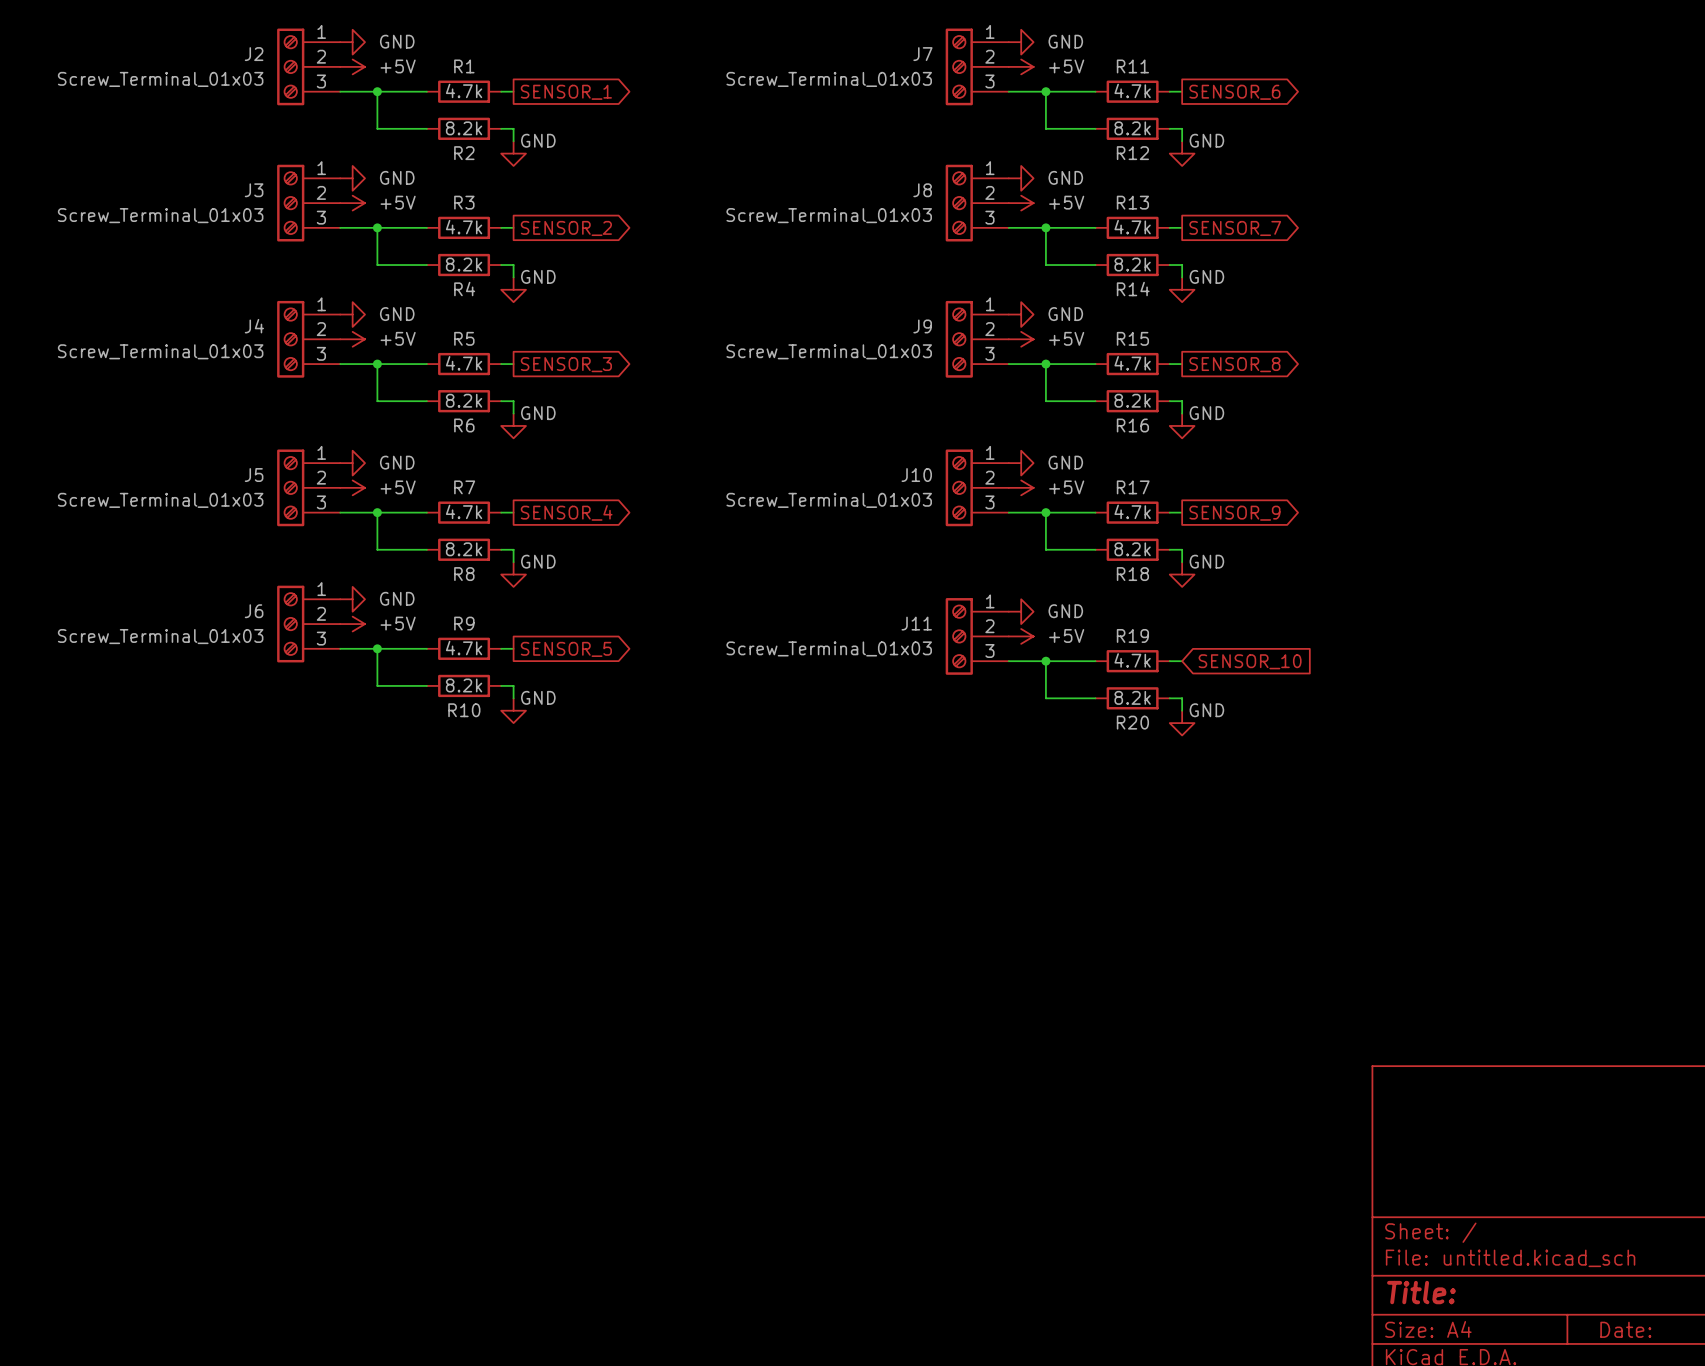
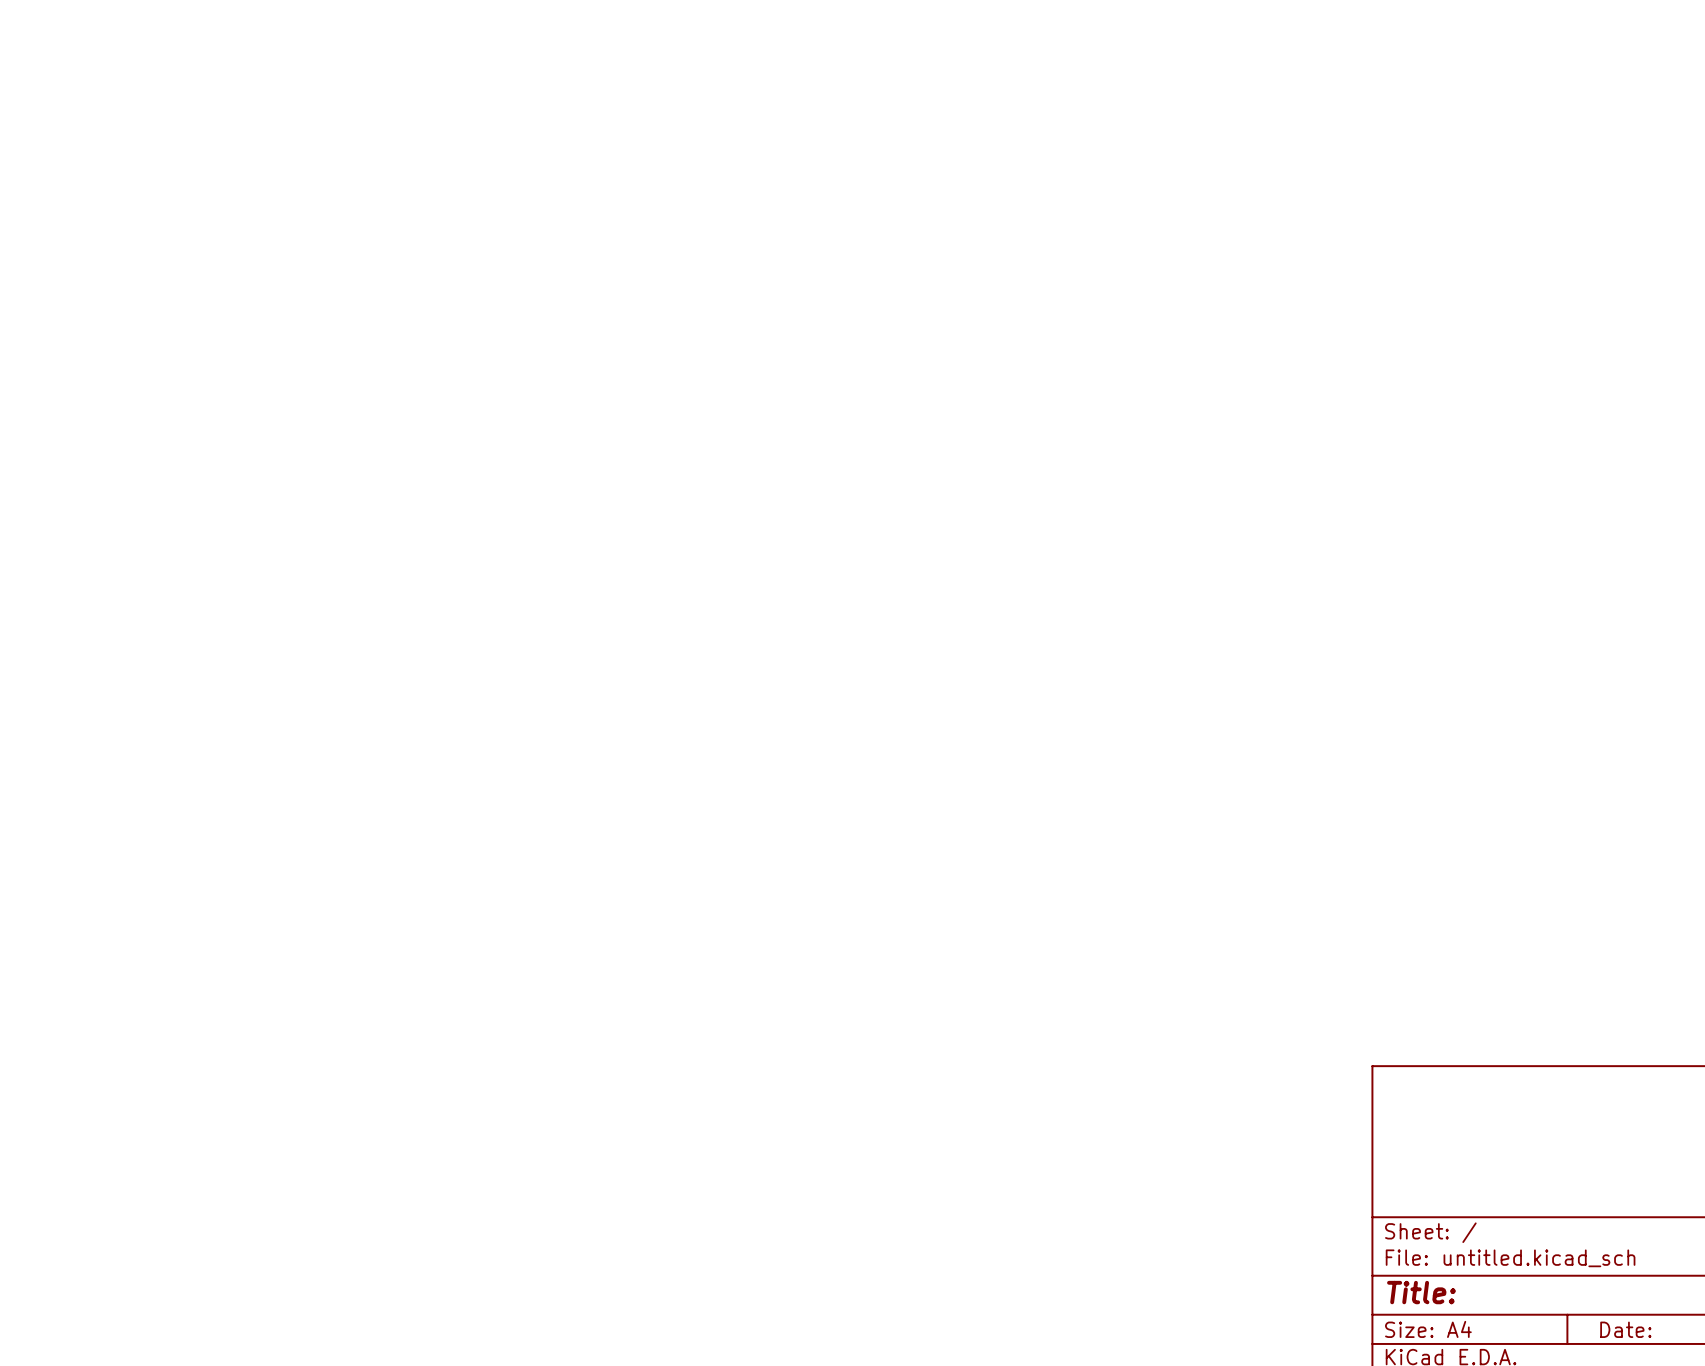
power symbol: GND (352, 42) -> none
power symbol: GND (1021, 42) -> none
J2: Screw_Terminal_01x03 (308, 66) -> none
power symbol: +5V (352, 66) -> none
J7: Screw_Terminal_01x03 (977, 66) -> none
power symbol: +5V (1021, 66) -> none
wire: (340, 91) (426, 91) -> none
wire: (377, 91) (377, 128) (426, 128) -> none
junction: (377, 91) -> none
R1: 4.7k (464, 91) -> none
wire: (501, 91) (513, 91) -> none
wire: (1008, 91) (1095, 91) -> none
wire: (1045, 91) (1045, 128) (1095, 128) -> none
junction: (1045, 91) -> none
R11: 4.7k (1132, 91) -> none
wire: (1169, 91) (1182, 91) -> none
global label: SENSOR_1 (566, 92) -> none
global label: SENSOR_6 (1234, 92) -> none
R2: 8.2k (464, 128) -> none
wire: (501, 128) (513, 128) (513, 141) -> none
R12: 8.2k (1132, 128) -> none
wire: (1169, 128) (1182, 128) (1182, 141) -> none
power symbol: GND (513, 153) -> none
power symbol: GND (1182, 153) -> none
power symbol: GND (352, 178) -> none
power symbol: GND (1021, 178) -> none
J3: Screw_Terminal_01x03 (308, 203) -> none
power symbol: +5V (352, 203) -> none
J8: Screw_Terminal_01x03 (977, 203) -> none
power symbol: +5V (1021, 203) -> none
wire: (340, 227) (426, 227) -> none
wire: (377, 227) (377, 265) (426, 265) -> none
junction: (377, 227) -> none
R3: 4.7k (464, 227) -> none
wire: (501, 227) (513, 227) -> none
wire: (1008, 227) (1095, 227) -> none
wire: (1045, 227) (1045, 265) (1095, 265) -> none
junction: (1045, 227) -> none
R13: 4.7k (1132, 227) -> none
wire: (1169, 227) (1182, 227) -> none
global label: SENSOR_2 (566, 228) -> none
global label: SENSOR_7 (1235, 228) -> none
R4: 8.2k (464, 265) -> none
wire: (501, 265) (513, 265) (513, 277) -> none
R14: 8.2k (1132, 265) -> none
wire: (1169, 265) (1182, 265) (1182, 277) -> none
power symbol: GND (513, 289) -> none
power symbol: GND (1182, 289) -> none
power symbol: GND (352, 314) -> none
power symbol: GND (1021, 314) -> none
J4: Screw_Terminal_01x03 (308, 339) -> none
power symbol: +5V (352, 339) -> none
J9: Screw_Terminal_01x03 (977, 339) -> none
power symbol: +5V (1021, 339) -> none
wire: (340, 364) (426, 364) -> none
wire: (377, 364) (377, 401) (426, 401) -> none
junction: (377, 364) -> none
R5: 4.7k (464, 364) -> none
wire: (501, 364) (513, 364) -> none
global label: SENSOR_3 (566, 364) -> none
wire: (1008, 364) (1095, 364) -> none
wire: (1045, 364) (1045, 401) (1095, 401) -> none
junction: (1045, 364) -> none
R15: 4.7k (1132, 364) -> none
wire: (1169, 364) (1182, 364) -> none
global label: SENSOR_8 (1234, 364) -> none
R6: 8.2k (464, 401) -> none
wire: (501, 401) (513, 401) (513, 413) -> none
R16: 8.2k (1132, 401) -> none
wire: (1169, 401) (1182, 401) (1182, 413) -> none
power symbol: GND (513, 425) -> none
power symbol: GND (1182, 425) -> none
power symbol: GND (352, 463) -> none
power symbol: GND (1021, 463) -> none
J5: Screw_Terminal_01x03 (308, 487) -> none
power symbol: +5V (352, 487) -> none
J10: Screw_Terminal_01x03 (977, 487) -> none
power symbol: +5V (1021, 487) -> none
wire: (340, 512) (426, 512) -> none
wire: (377, 512) (377, 549) (426, 549) -> none
junction: (377, 512) -> none
R7: 4.7k (464, 512) -> none
wire: (501, 512) (513, 512) -> none
global label: SENSOR_4 (566, 512) -> none
wire: (1008, 512) (1095, 512) -> none
wire: (1045, 512) (1045, 549) (1095, 549) -> none
junction: (1045, 512) -> none
R17: 4.7k (1132, 512) -> none
wire: (1169, 512) (1182, 512) -> none
global label: SENSOR_9 (1234, 513) -> none
R8: 8.2k (464, 549) -> none
wire: (501, 549) (513, 549) (513, 562) -> none
R18: 8.2k (1132, 549) -> none
wire: (1169, 549) (1182, 549) (1182, 562) -> none
power symbol: GND (513, 574) -> none
power symbol: GND (1182, 574) -> none
power symbol: GND (352, 599) -> none
power symbol: GND (1021, 611) -> none
J6: Screw_Terminal_01x03 (308, 624) -> none
power symbol: +5V (352, 624) -> none
J11: Screw_Terminal_01x03 (977, 636) -> none
power symbol: +5V (1021, 636) -> none
wire: (340, 648) (426, 648) -> none
wire: (377, 648) (377, 685) (426, 685) -> none
junction: (377, 648) -> none
R9: 4.7k (464, 648) -> none
wire: (501, 648) (513, 648) -> none
global label: SENSOR_5 (566, 649) -> none
wire: (1008, 661) (1095, 661) -> none
wire: (1045, 661) (1045, 698) (1095, 698) -> none
junction: (1045, 661) -> none
R19: 4.7k (1132, 661) -> none
wire: (1169, 661) (1182, 661) -> none
global label: SENSOR_10 (1250, 661) -> none
R10: 8.2k (464, 685) -> none
wire: (501, 685) (513, 685) (513, 698) -> none
R20: 8.2k (1132, 698) -> none
wire: (1169, 698) (1182, 698) (1182, 710) -> none
power symbol: GND (513, 710) -> none
power symbol: GND (1182, 723) -> none

